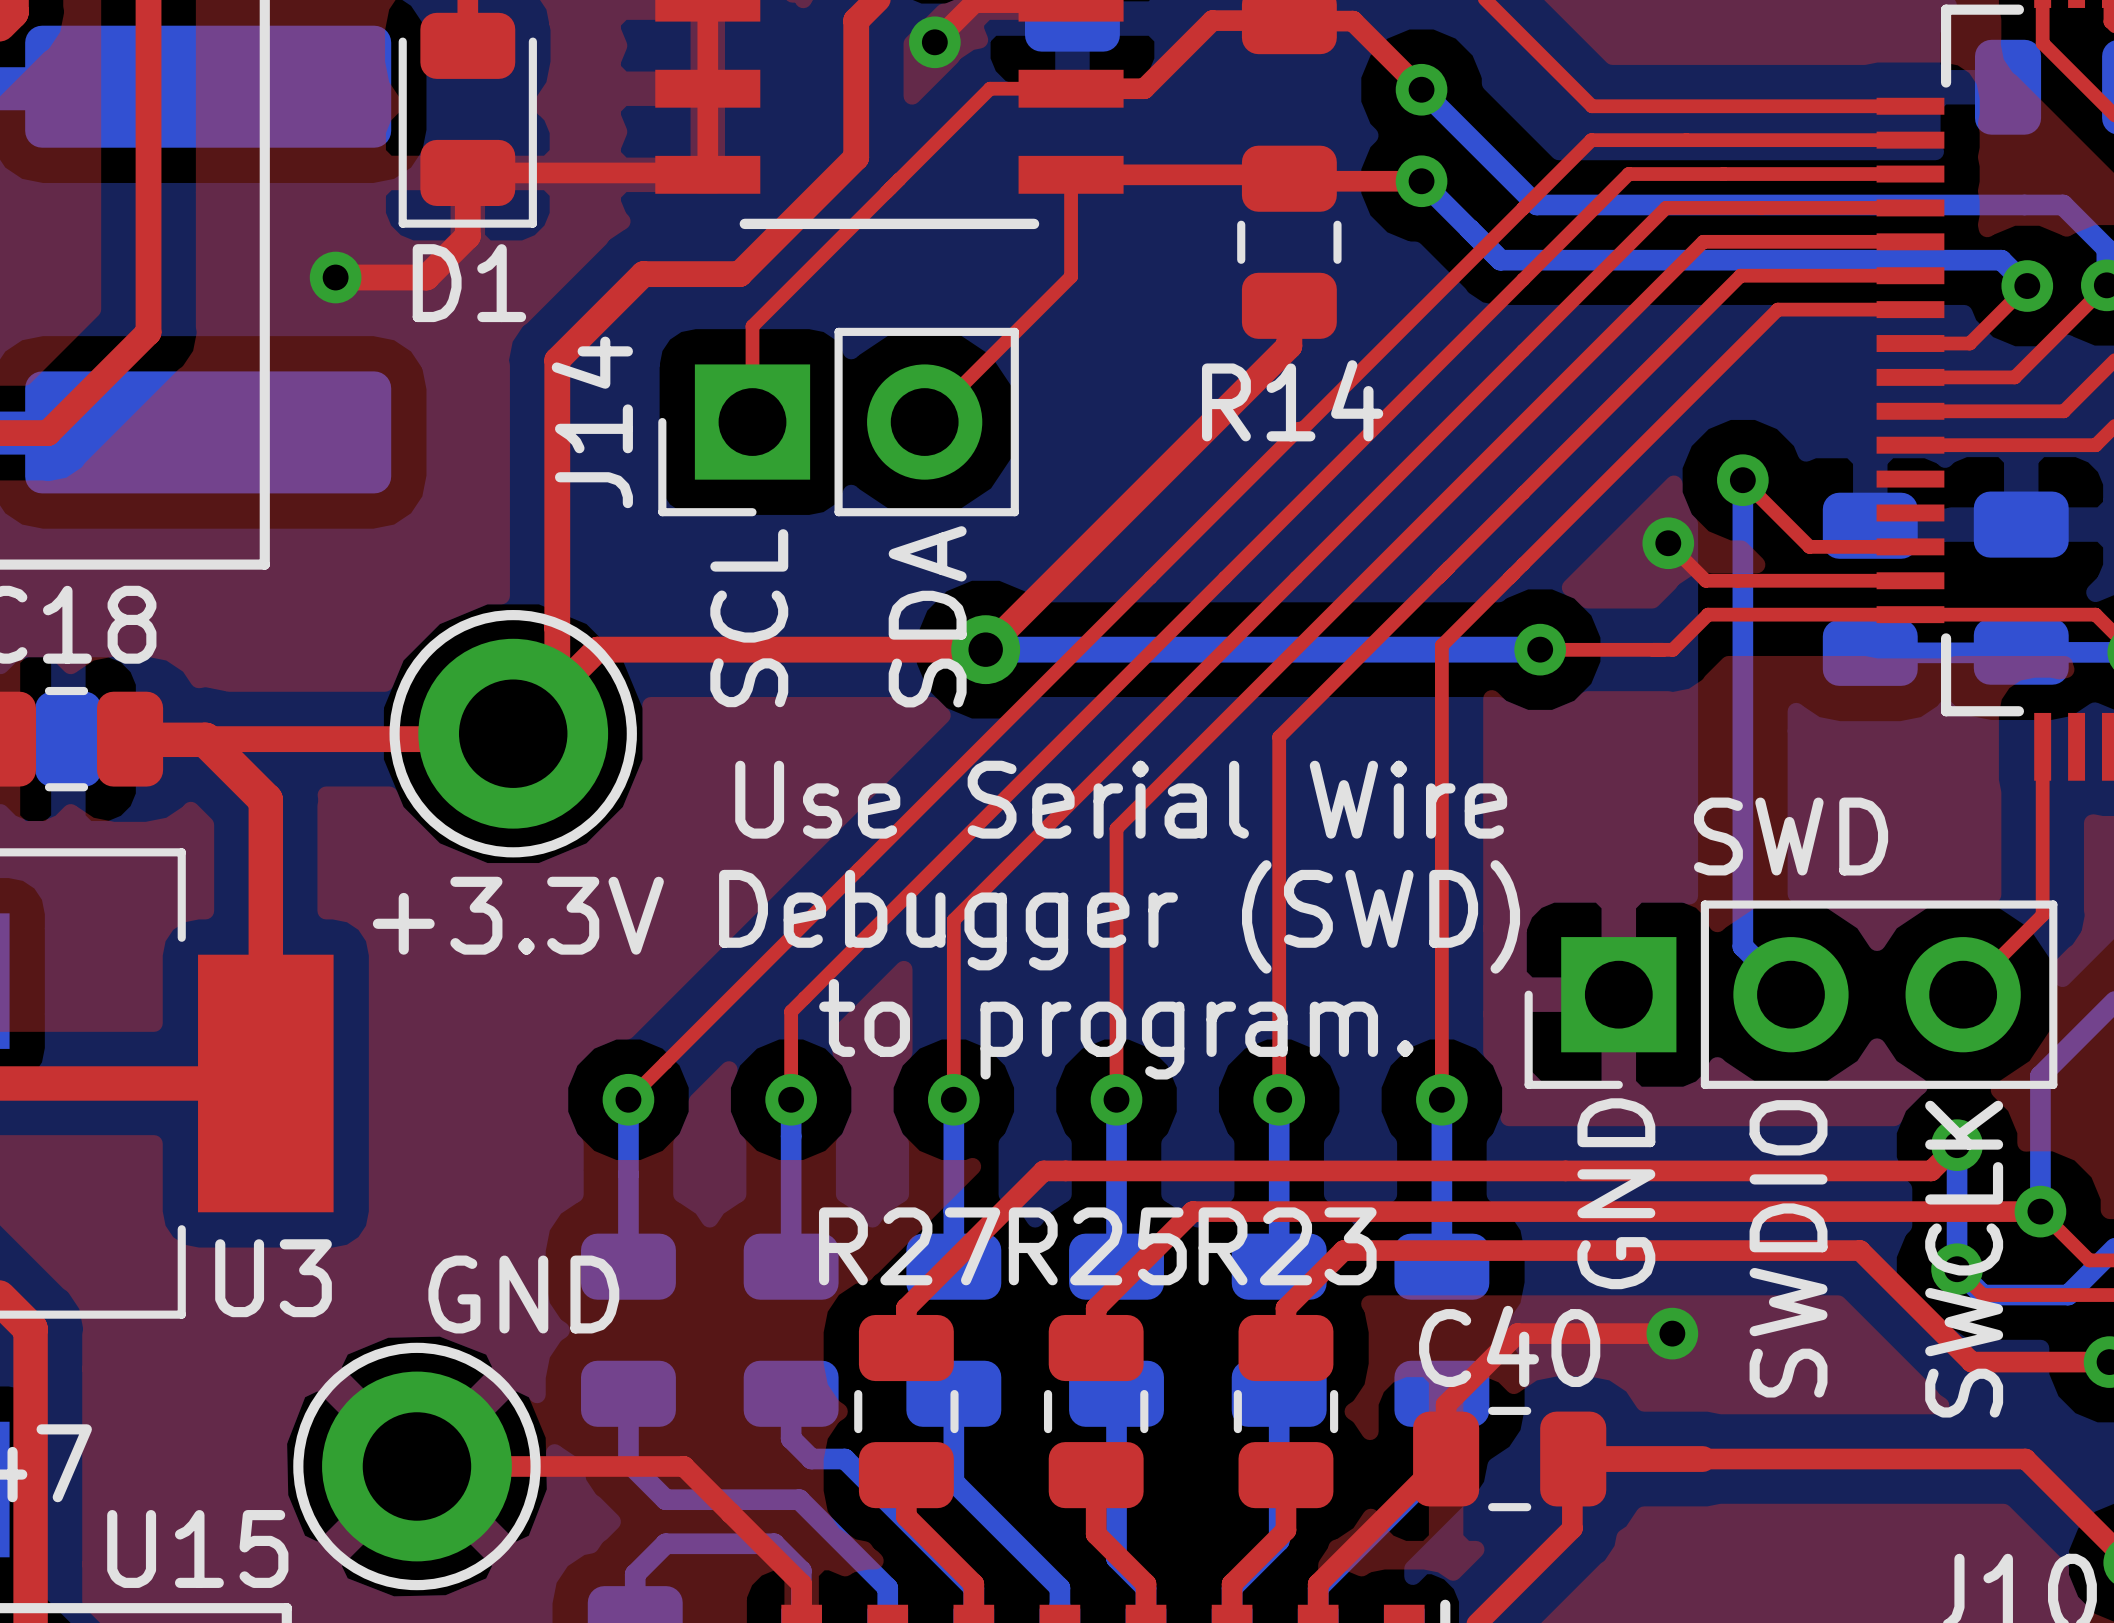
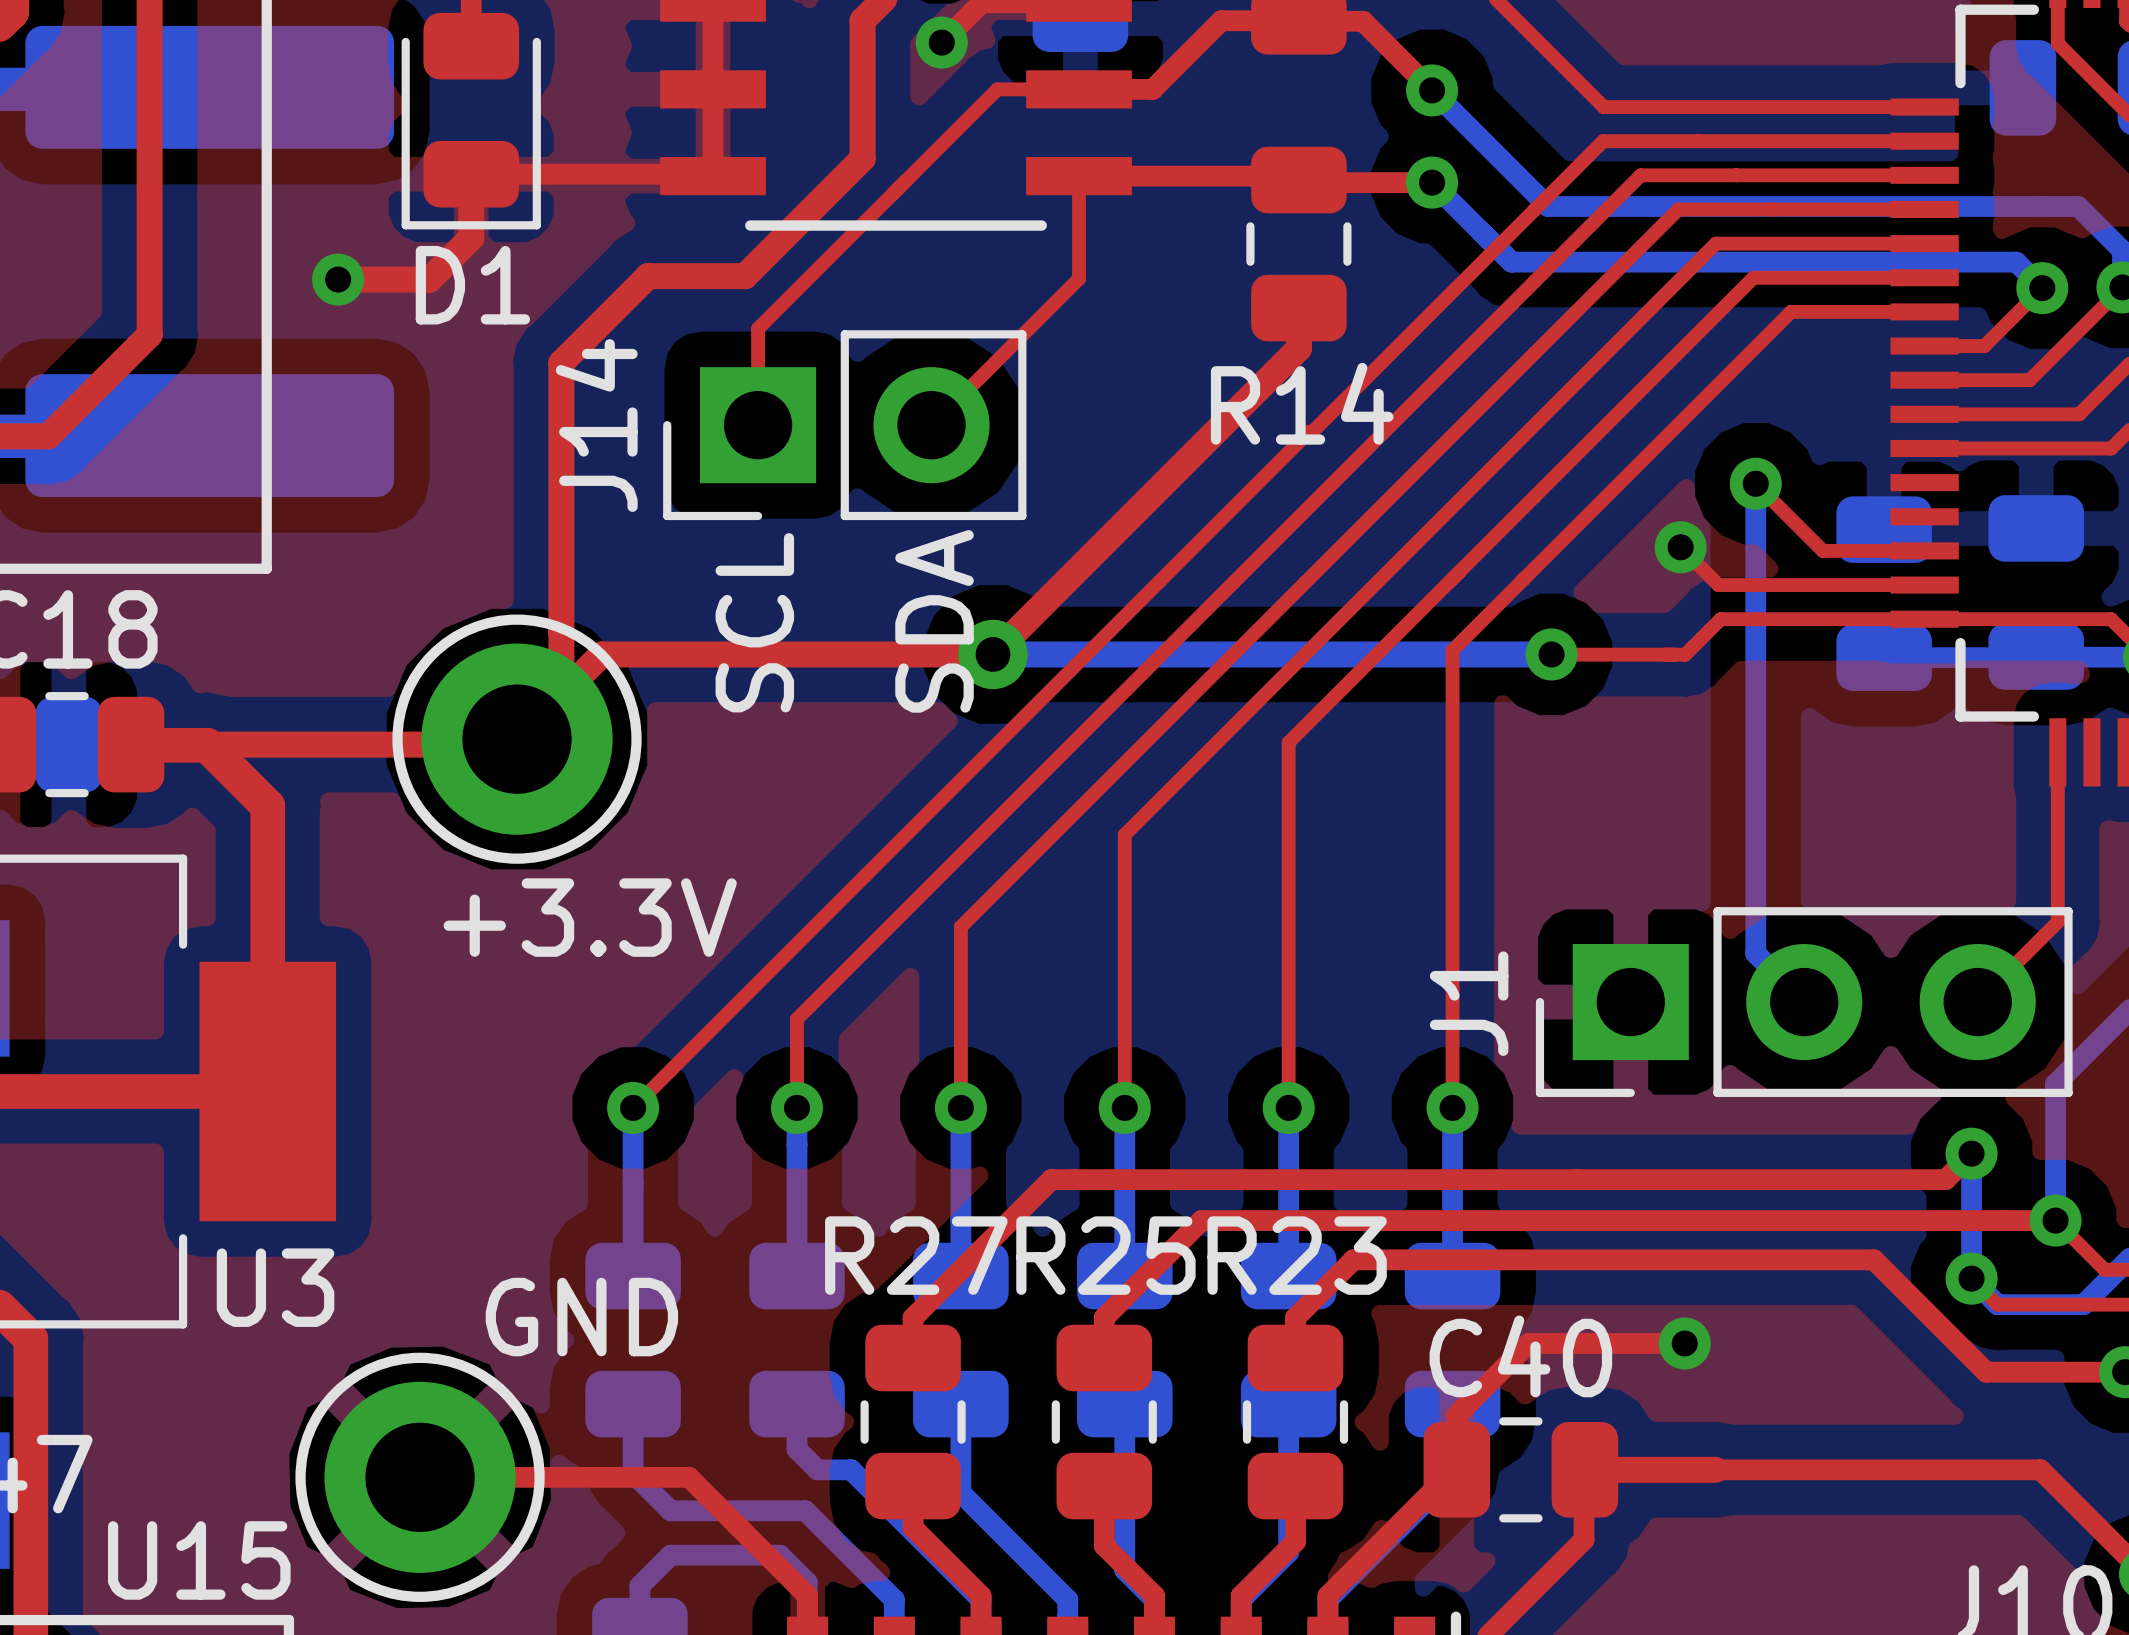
text: Use Serial Wire (1121, 799) -> none
text: SWD (1791, 836) -> none
text position: +3.3V (518, 915) -> +3.3V (590, 917)
text: Debugger (SWD) (1119, 916) -> none
J1 name: none -> J1 (1469, 1003)
text: to program. (1116, 1029) -> none
text: GND (1616, 1193) -> none
text: SWDIO (1788, 1248) -> none
text: SWCLK (1964, 1259) -> none
text position: GND (523, 1294) -> GND (581, 1317)

